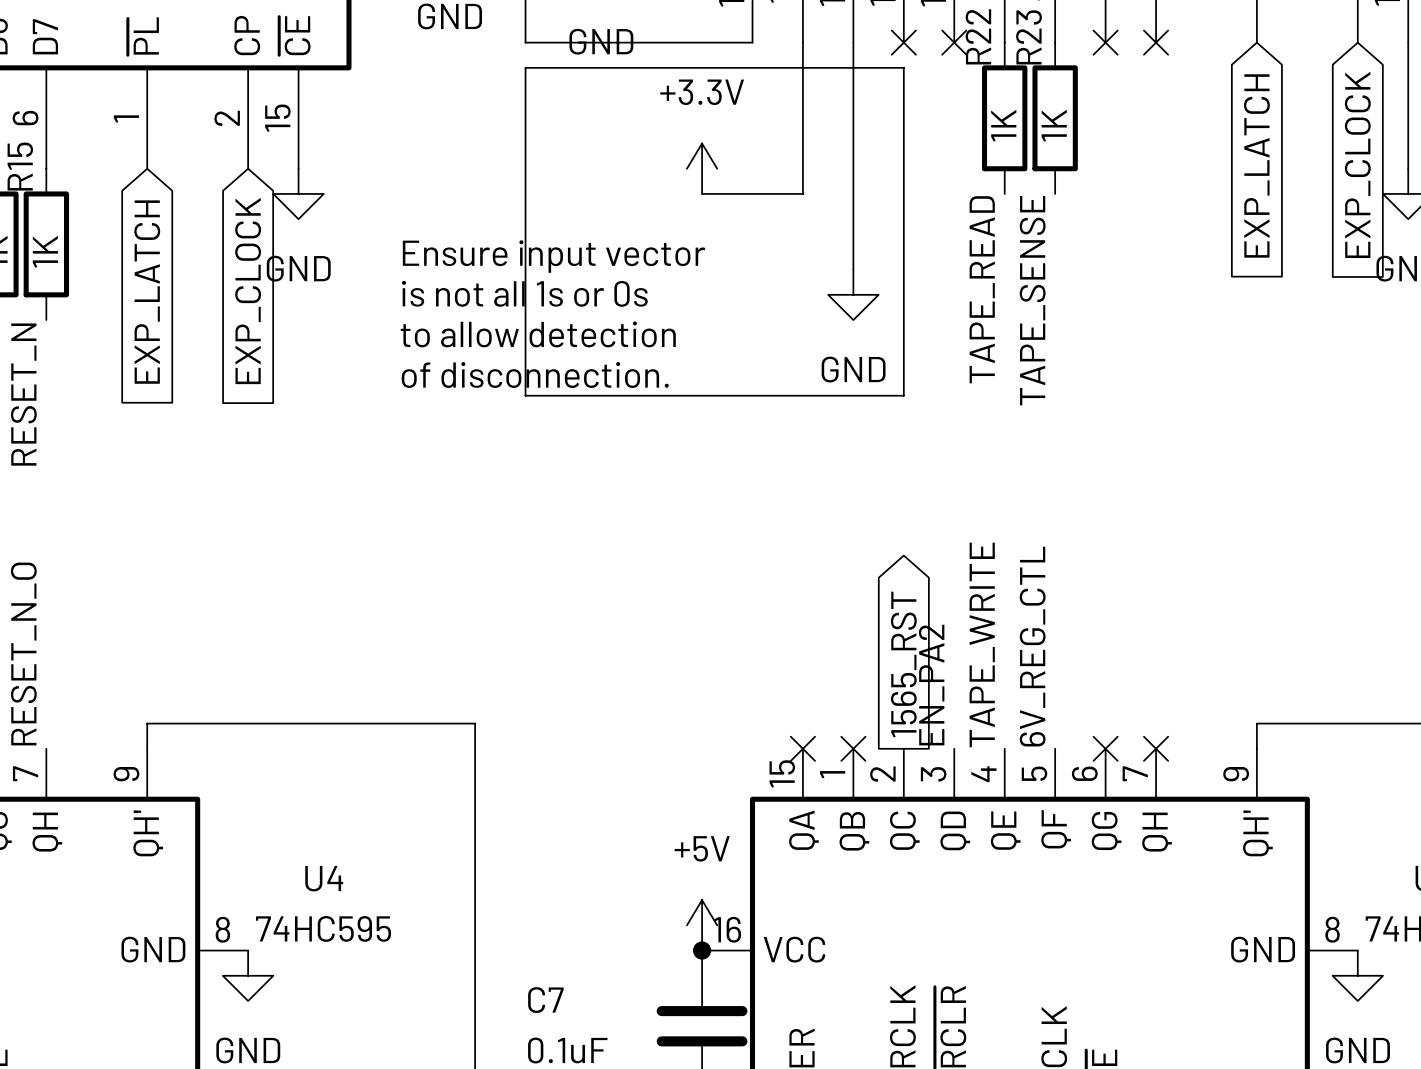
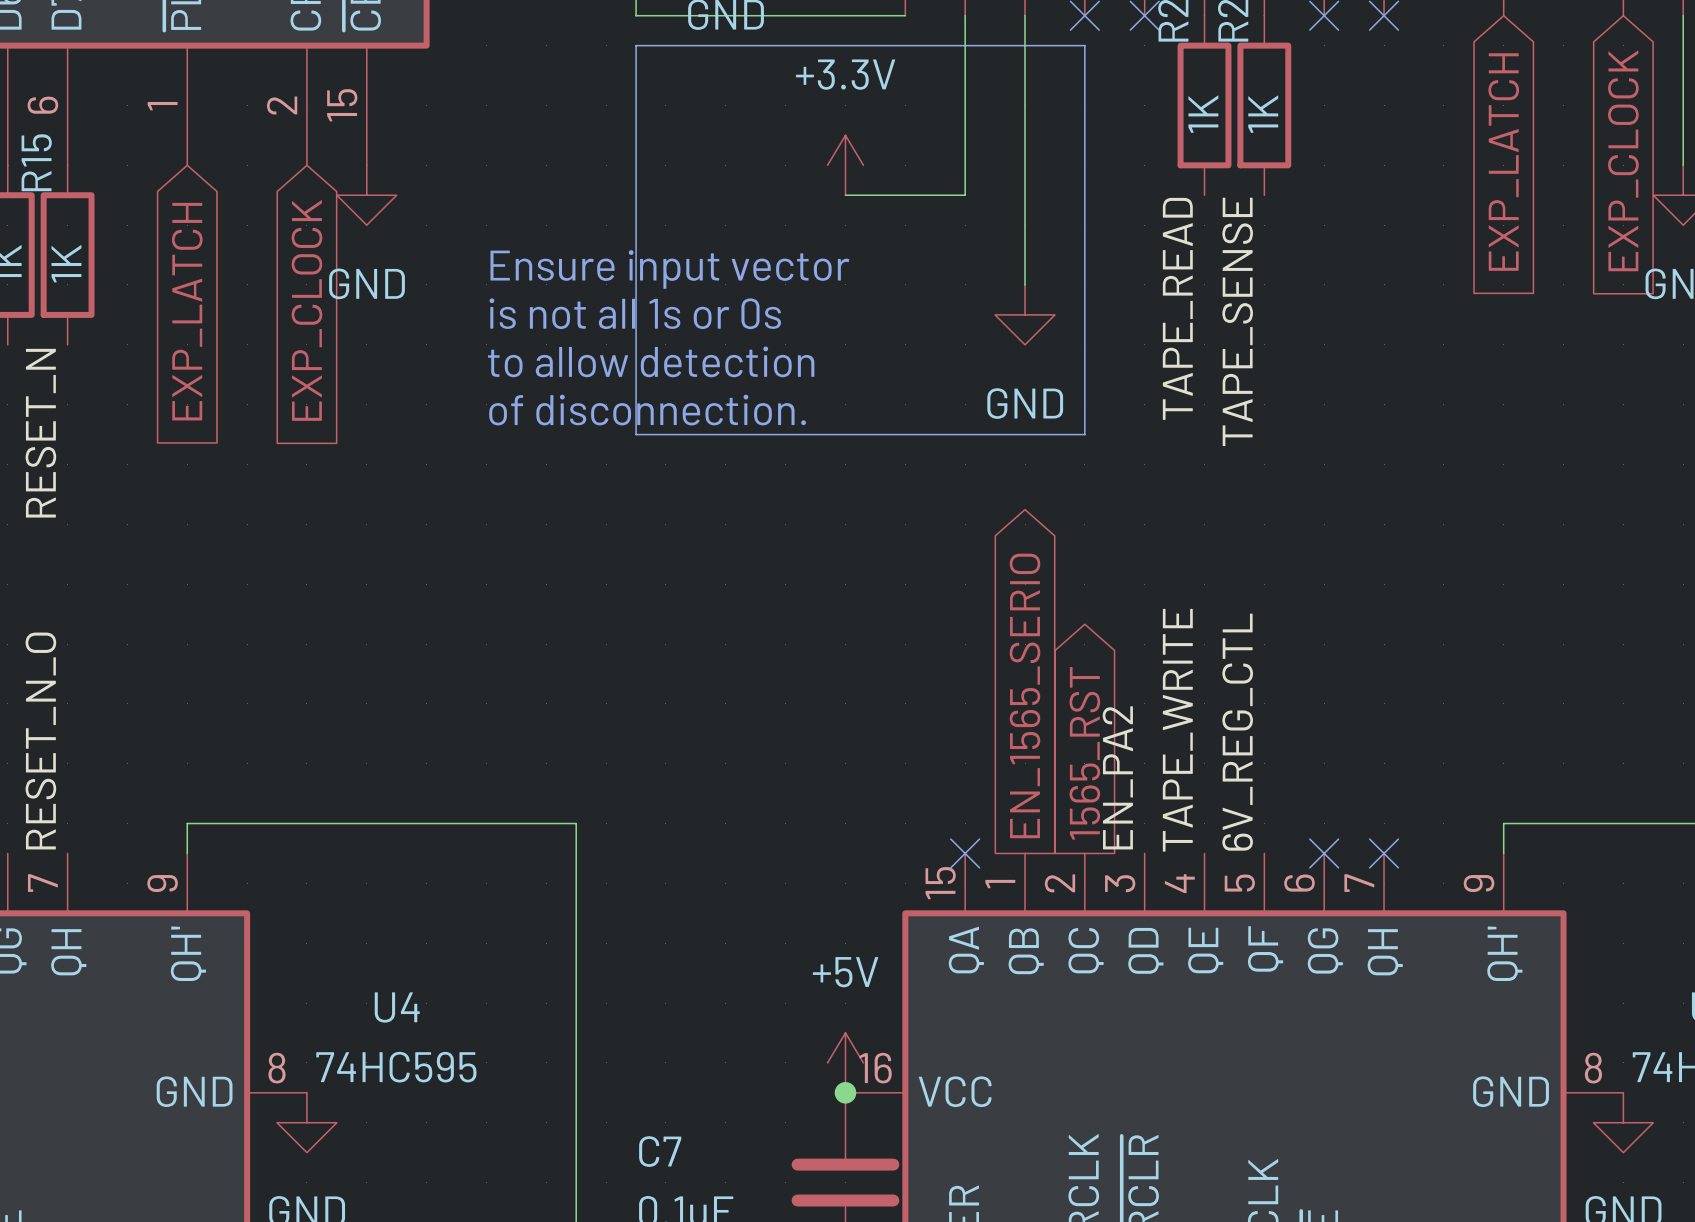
global label: none -> EN_1565_SERIO (1025, 695)
no-connect mark: (853, 748) -> none

